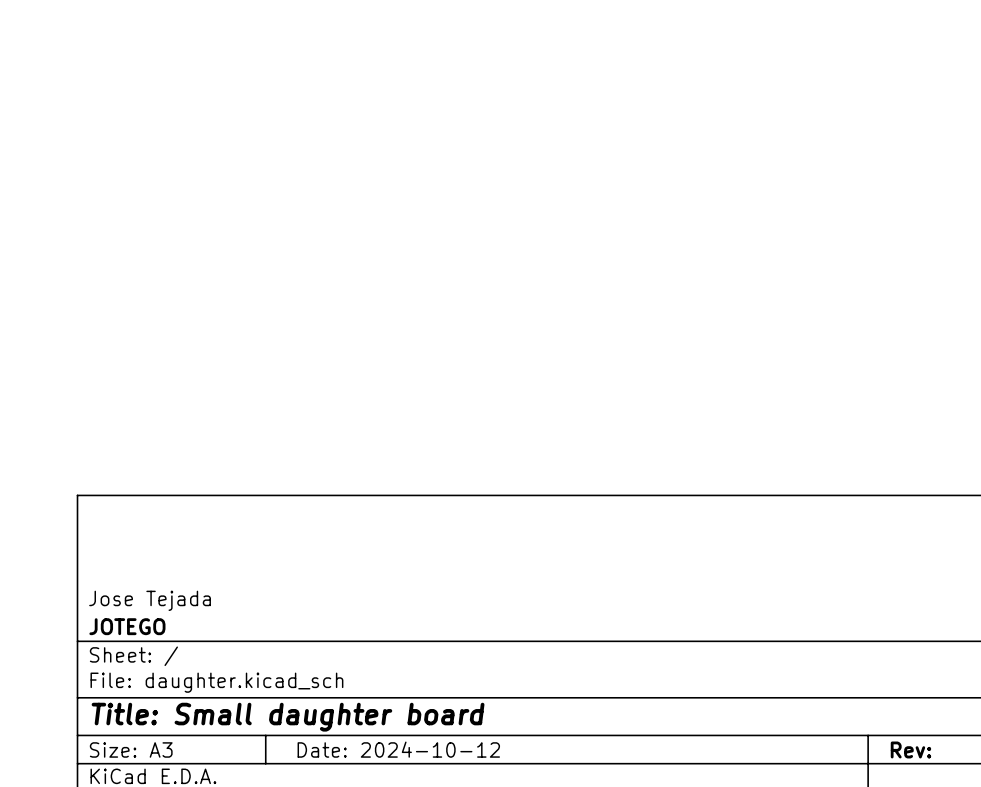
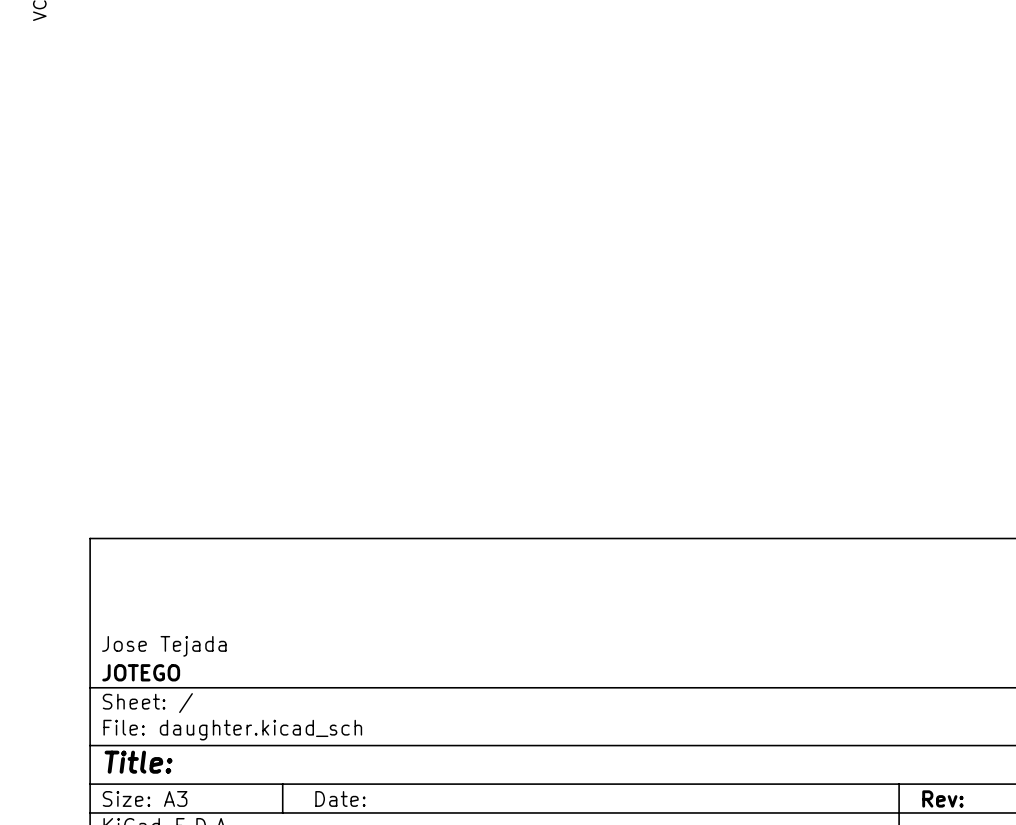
title block: Title: Small daughter board (288, 717) -> Title: (138, 762)
title block: Date: 2024-10-12 (398, 749) -> Date: (340, 798)

